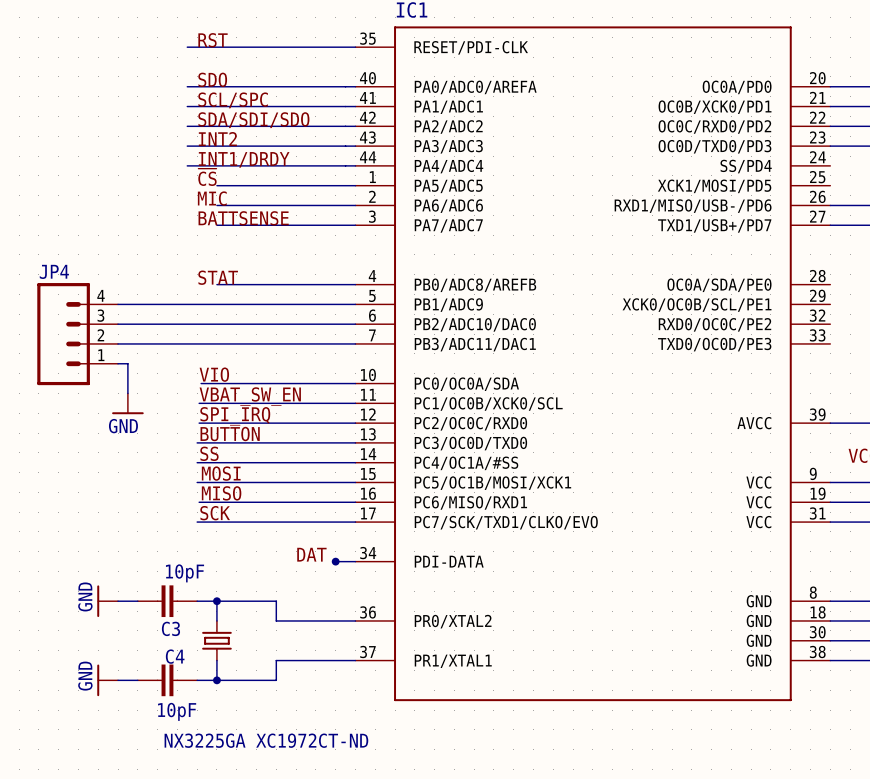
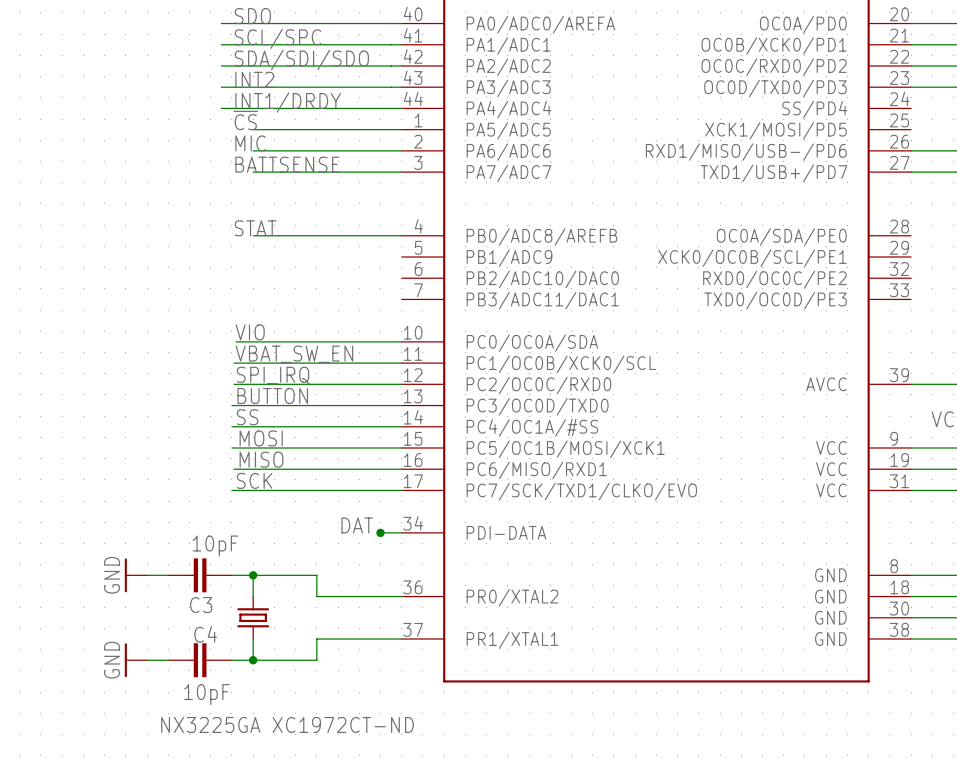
wire: (118, 304) (355, 304) -> none
wire: (118, 324) (355, 324) -> none
JP4: (77, 334) -> none
wire: (118, 343) (355, 343) -> none
wire: (118, 363) (127, 363) (127, 393) -> none
power symbol: GND (127, 403) -> none

